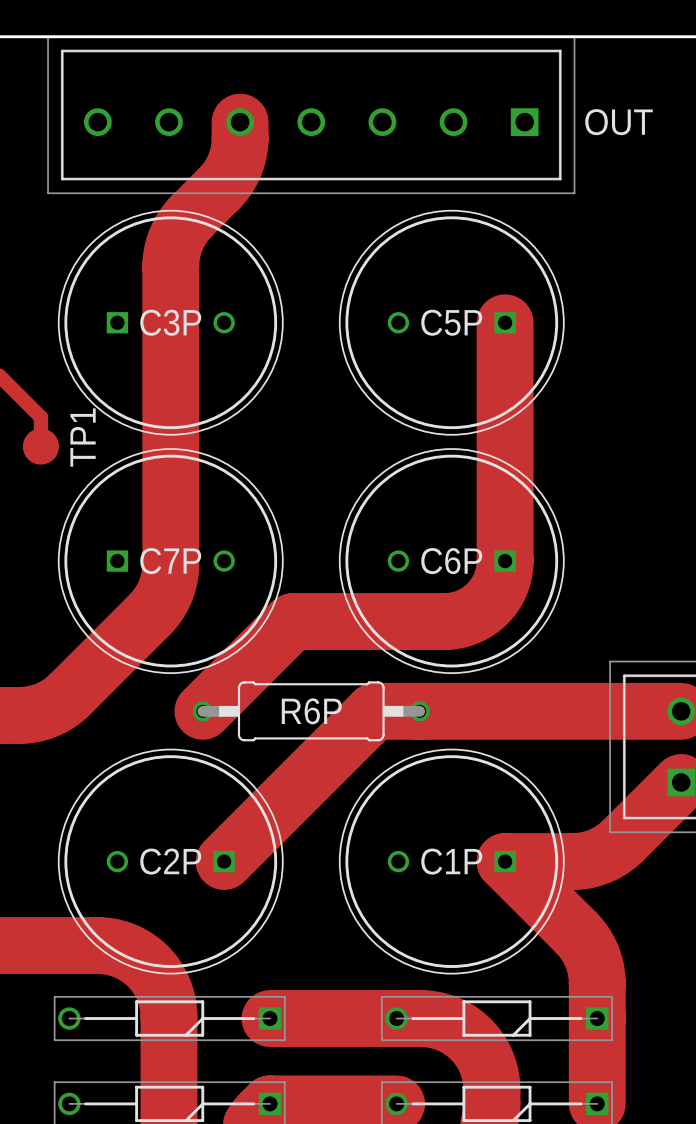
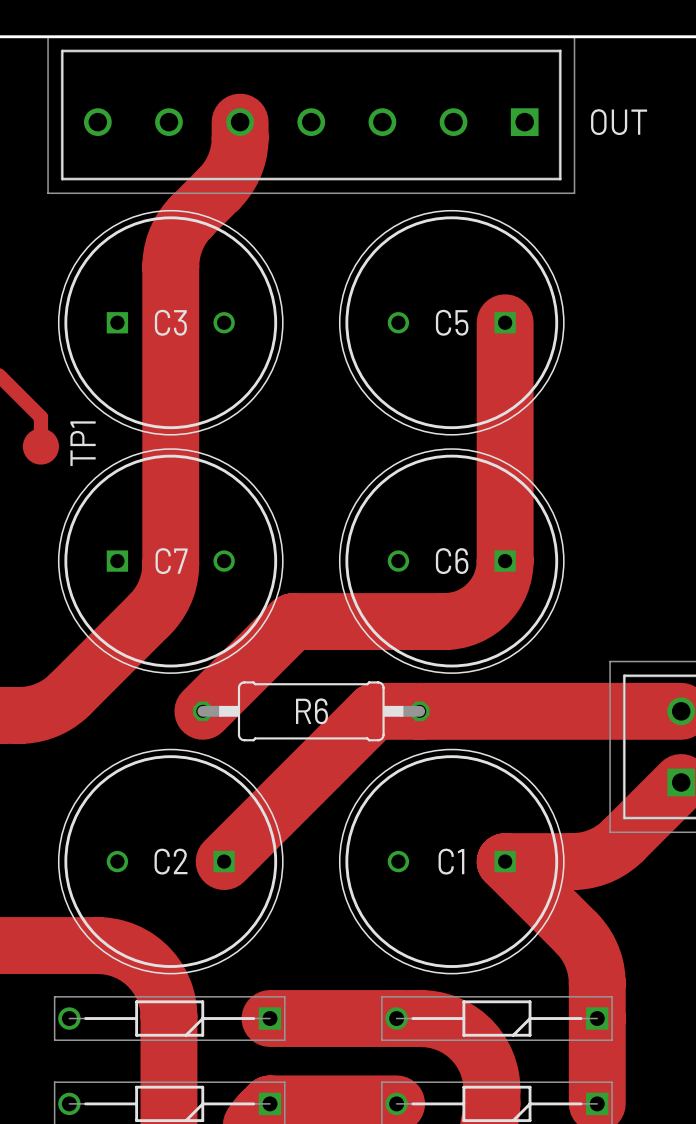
C3P name: C3P (170, 322) -> C3 (170, 322)
C5P name: C5P (451, 322) -> C5 (452, 322)
C7P name: C7P (170, 561) -> C7 (171, 561)
C6P name: C6P (451, 561) -> C6 (452, 561)
R6P name: R6P (311, 711) -> R6 (311, 711)
C2P name: C2P (170, 861) -> C2 (170, 861)
C1P name: C1P (451, 861) -> C1 (451, 861)

